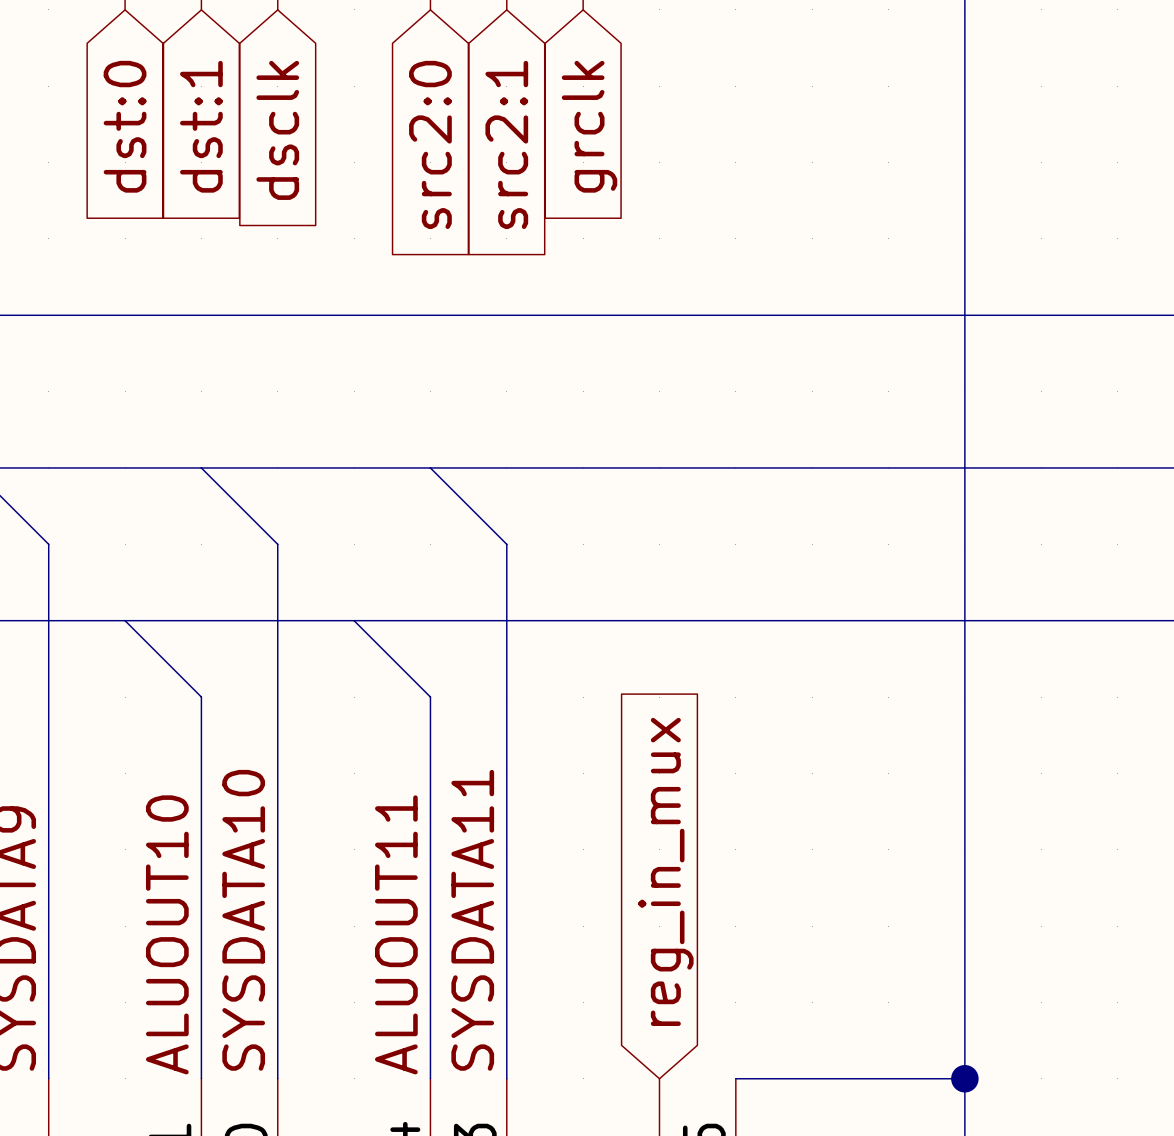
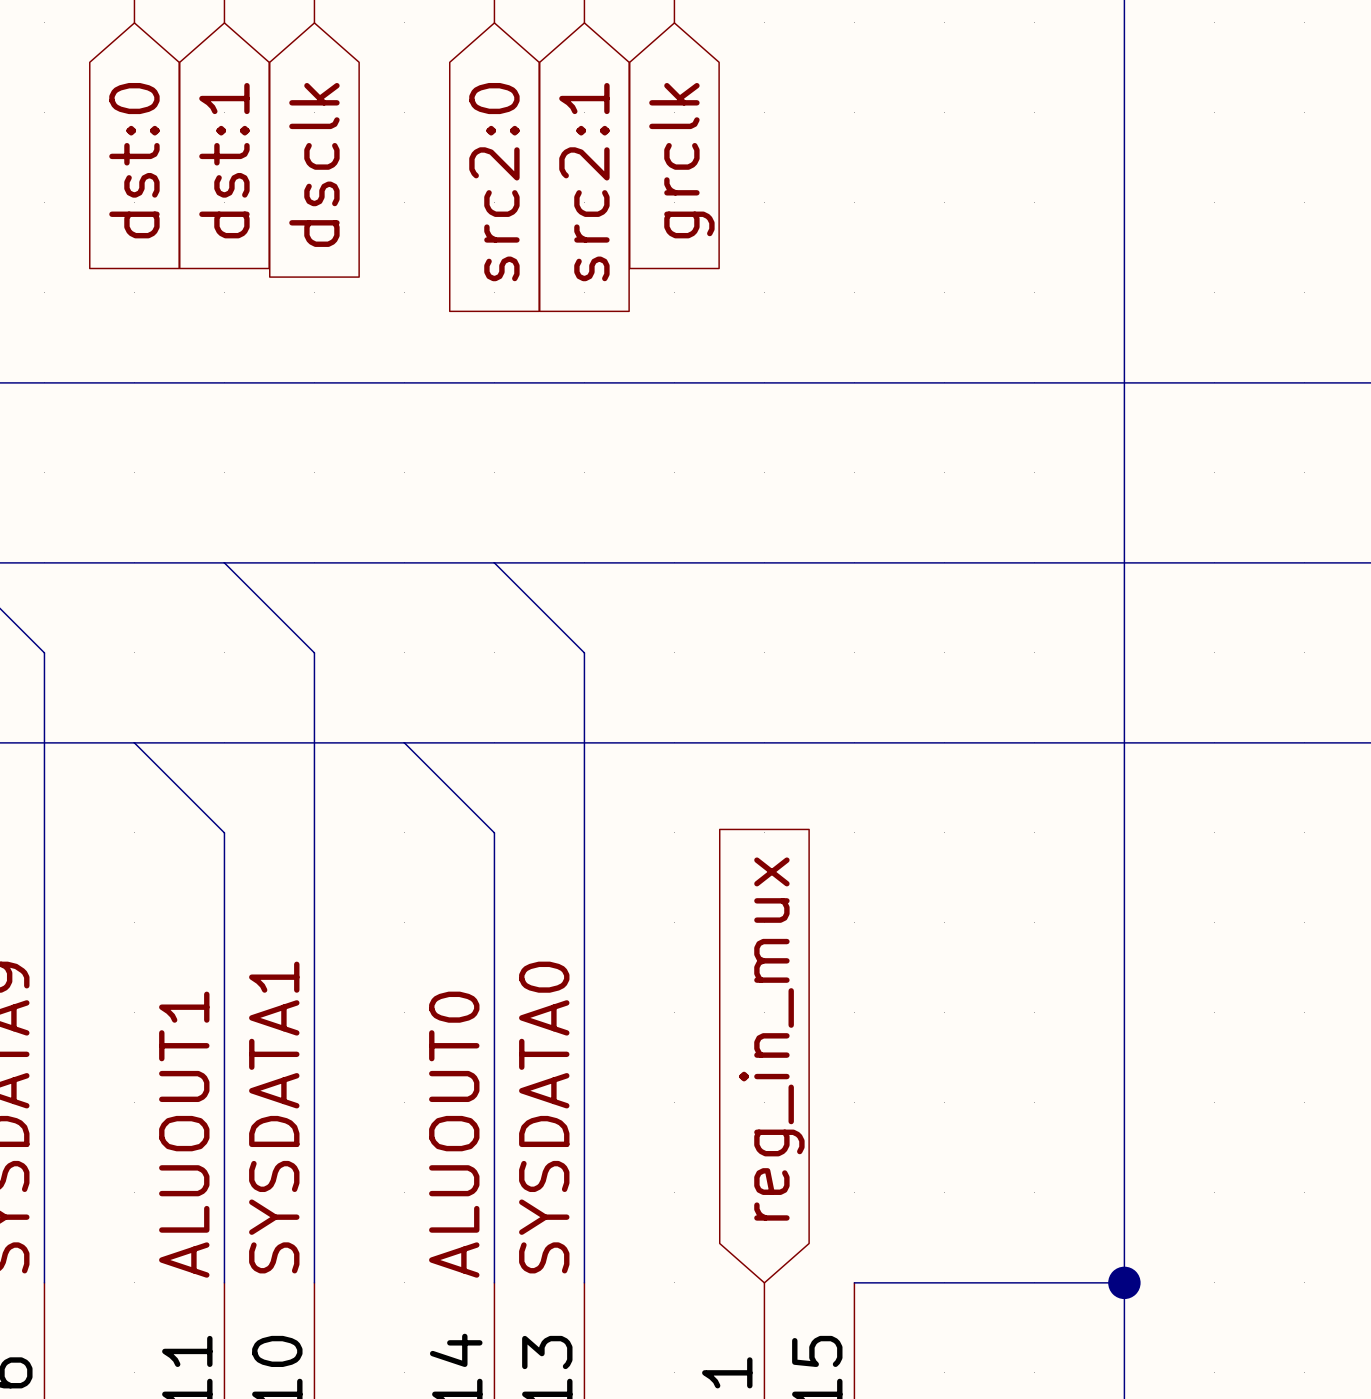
label: SYSDATA10 (243, 920) -> SYSDATA1 (274, 1117)
label: SYSDATA11 (472, 920) -> SYSDATA0 (544, 1117)
label: ALUOUT10 (167, 934) -> ALUOUT1 (184, 1134)
label: ALUOUT11 (396, 934) -> ALUOUT0 (454, 1134)

